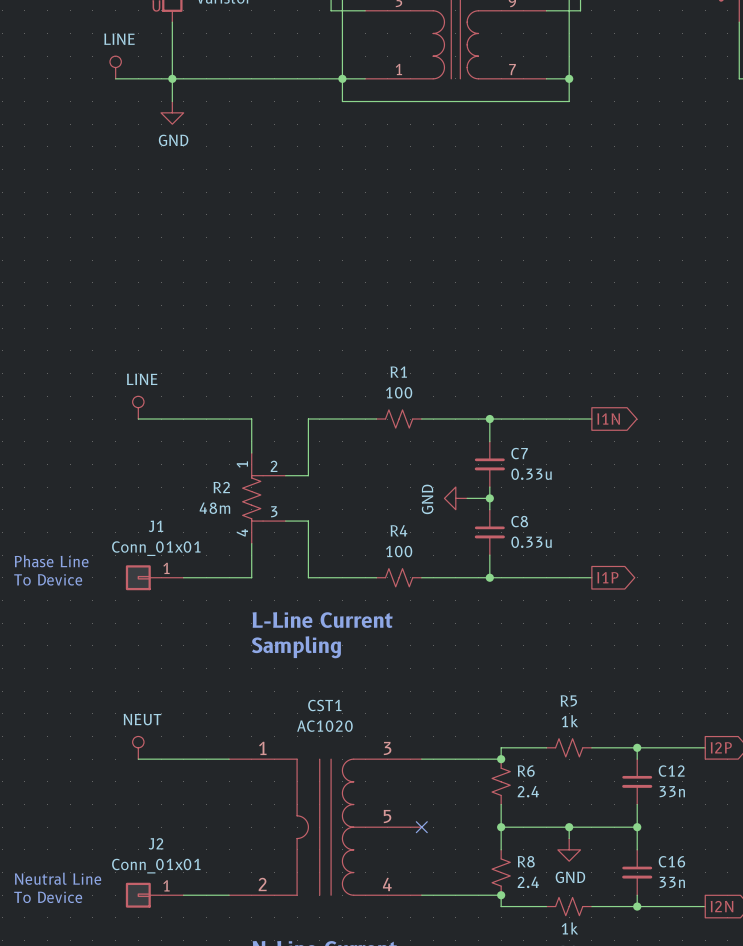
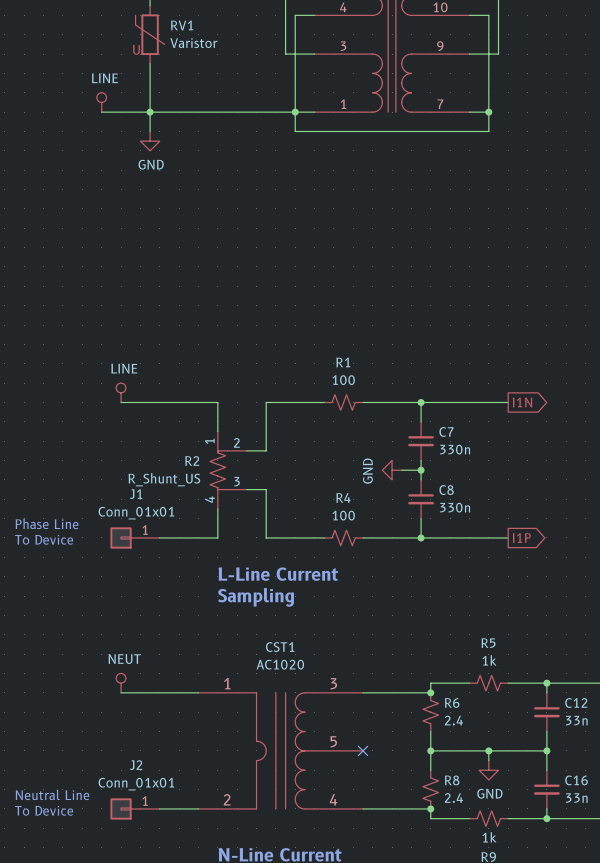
C7 value: 0.33u (531, 474) -> 330n (455, 449)
R2 value: 48m (214, 508) -> R_Shunt_US (164, 479)
C8 value: 0.33u (531, 542) -> 330n (455, 507)

